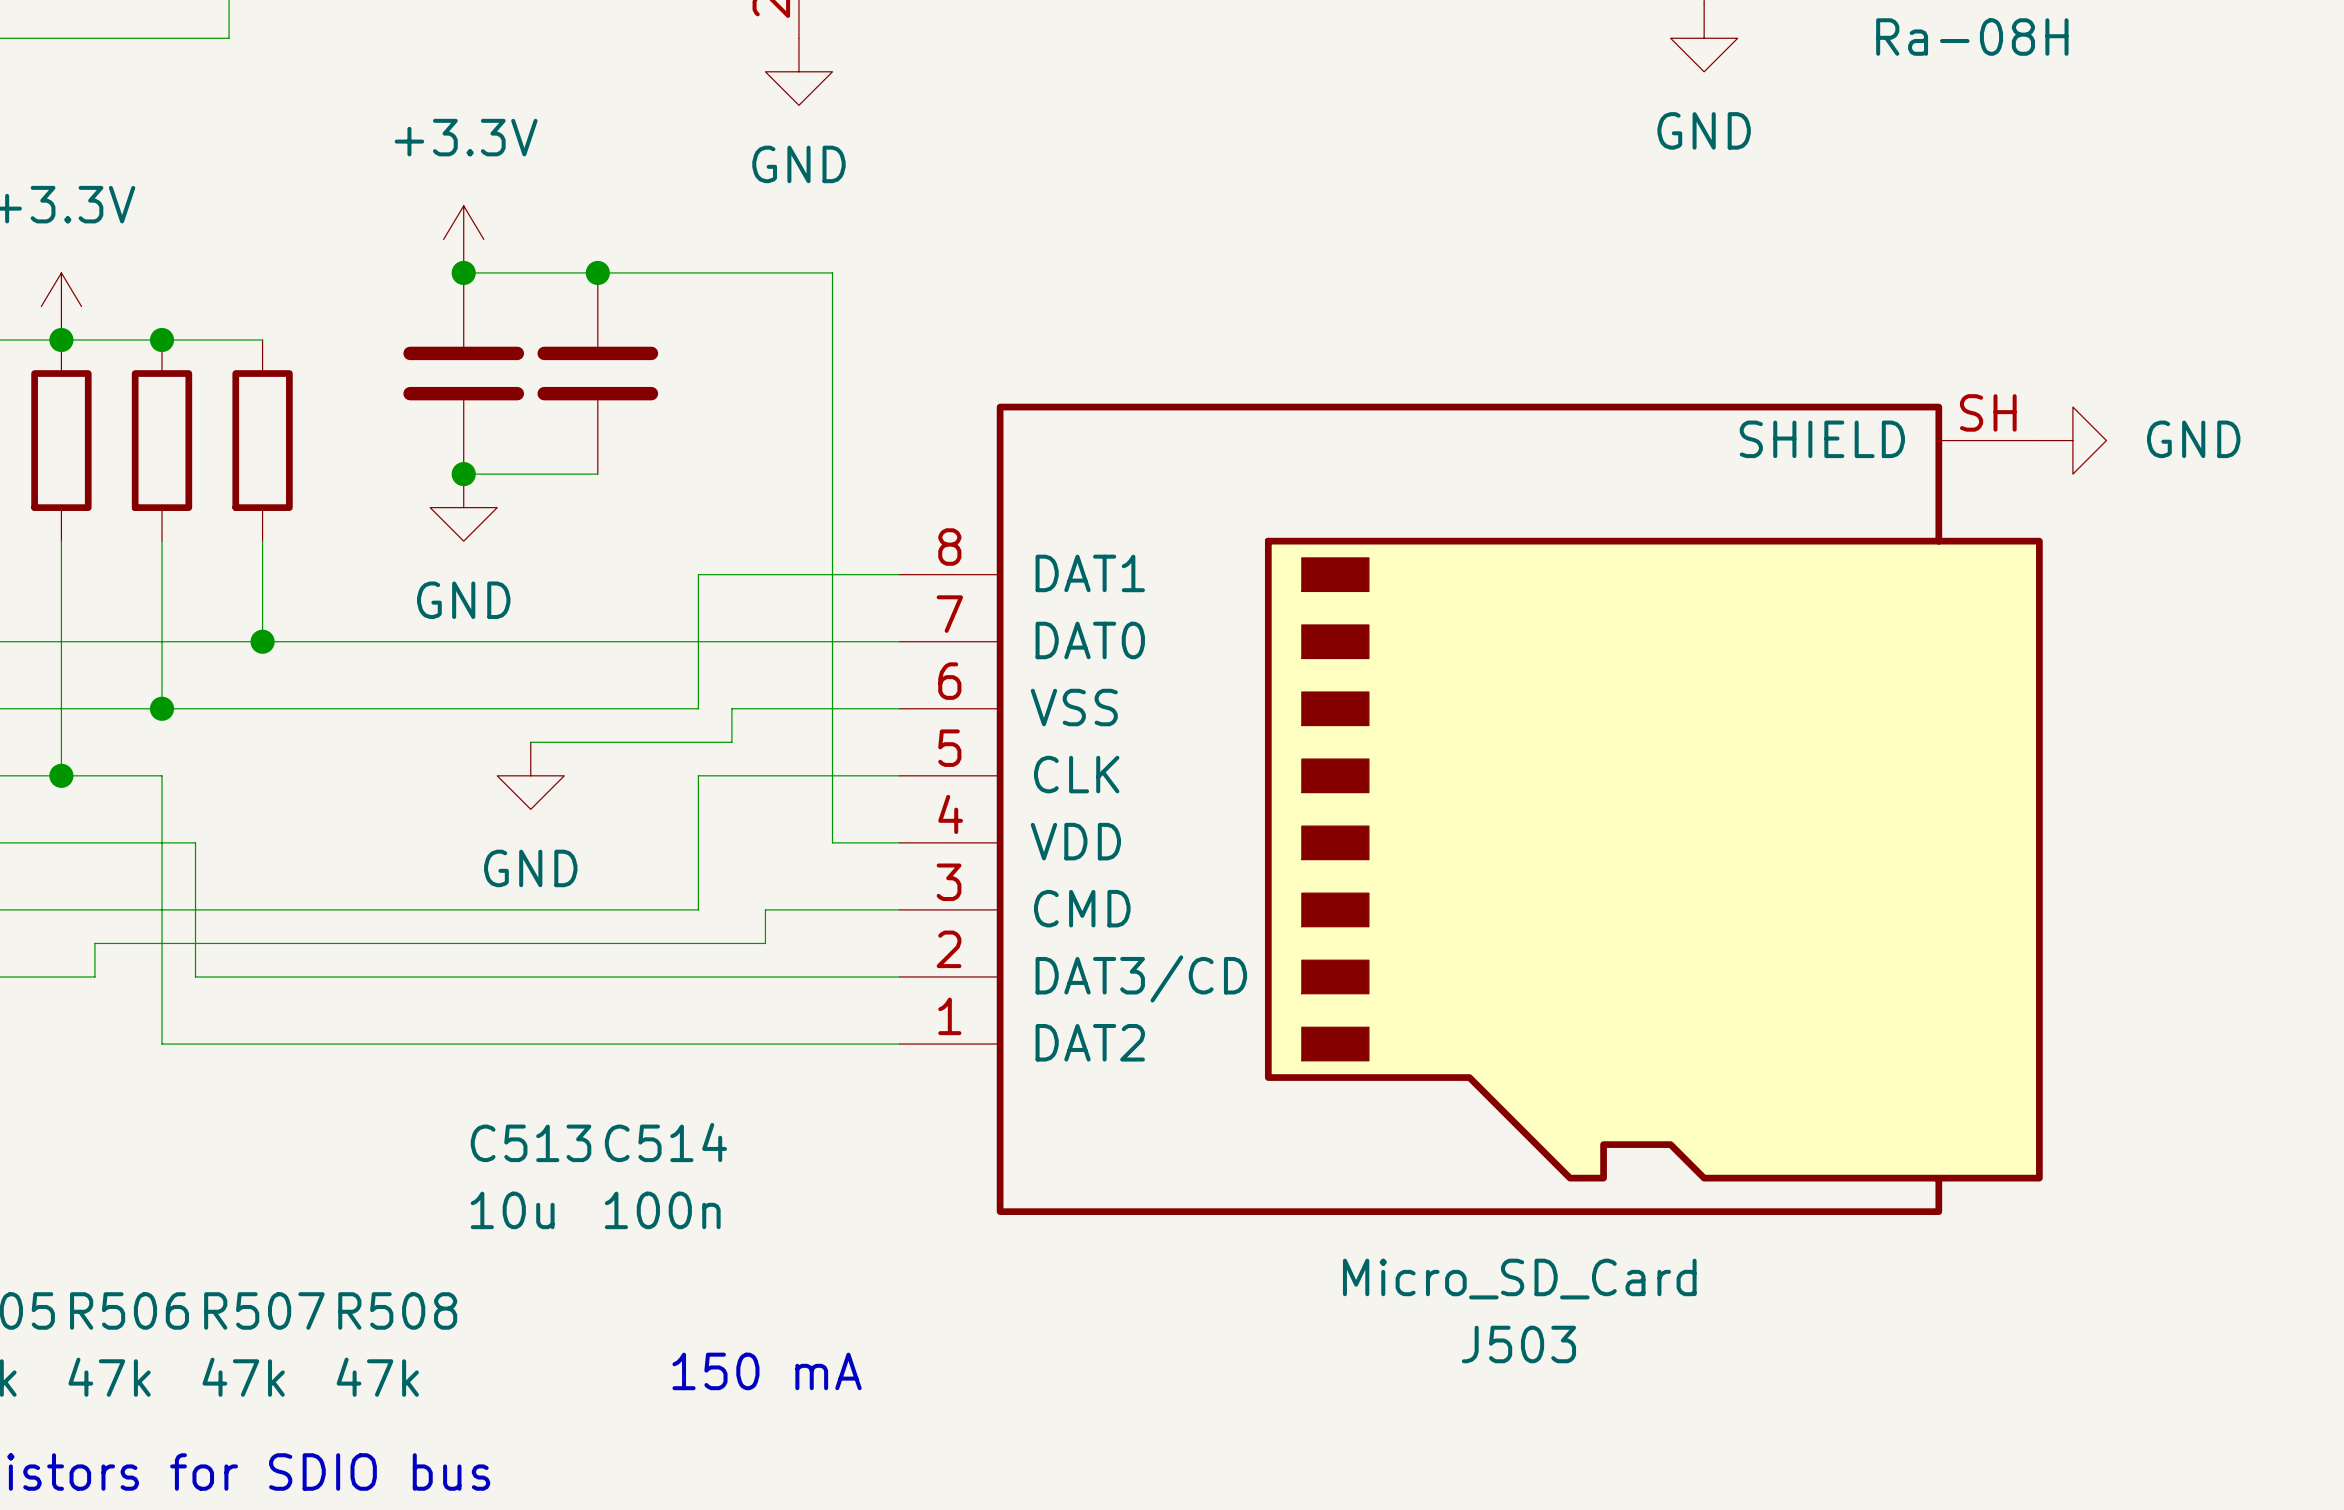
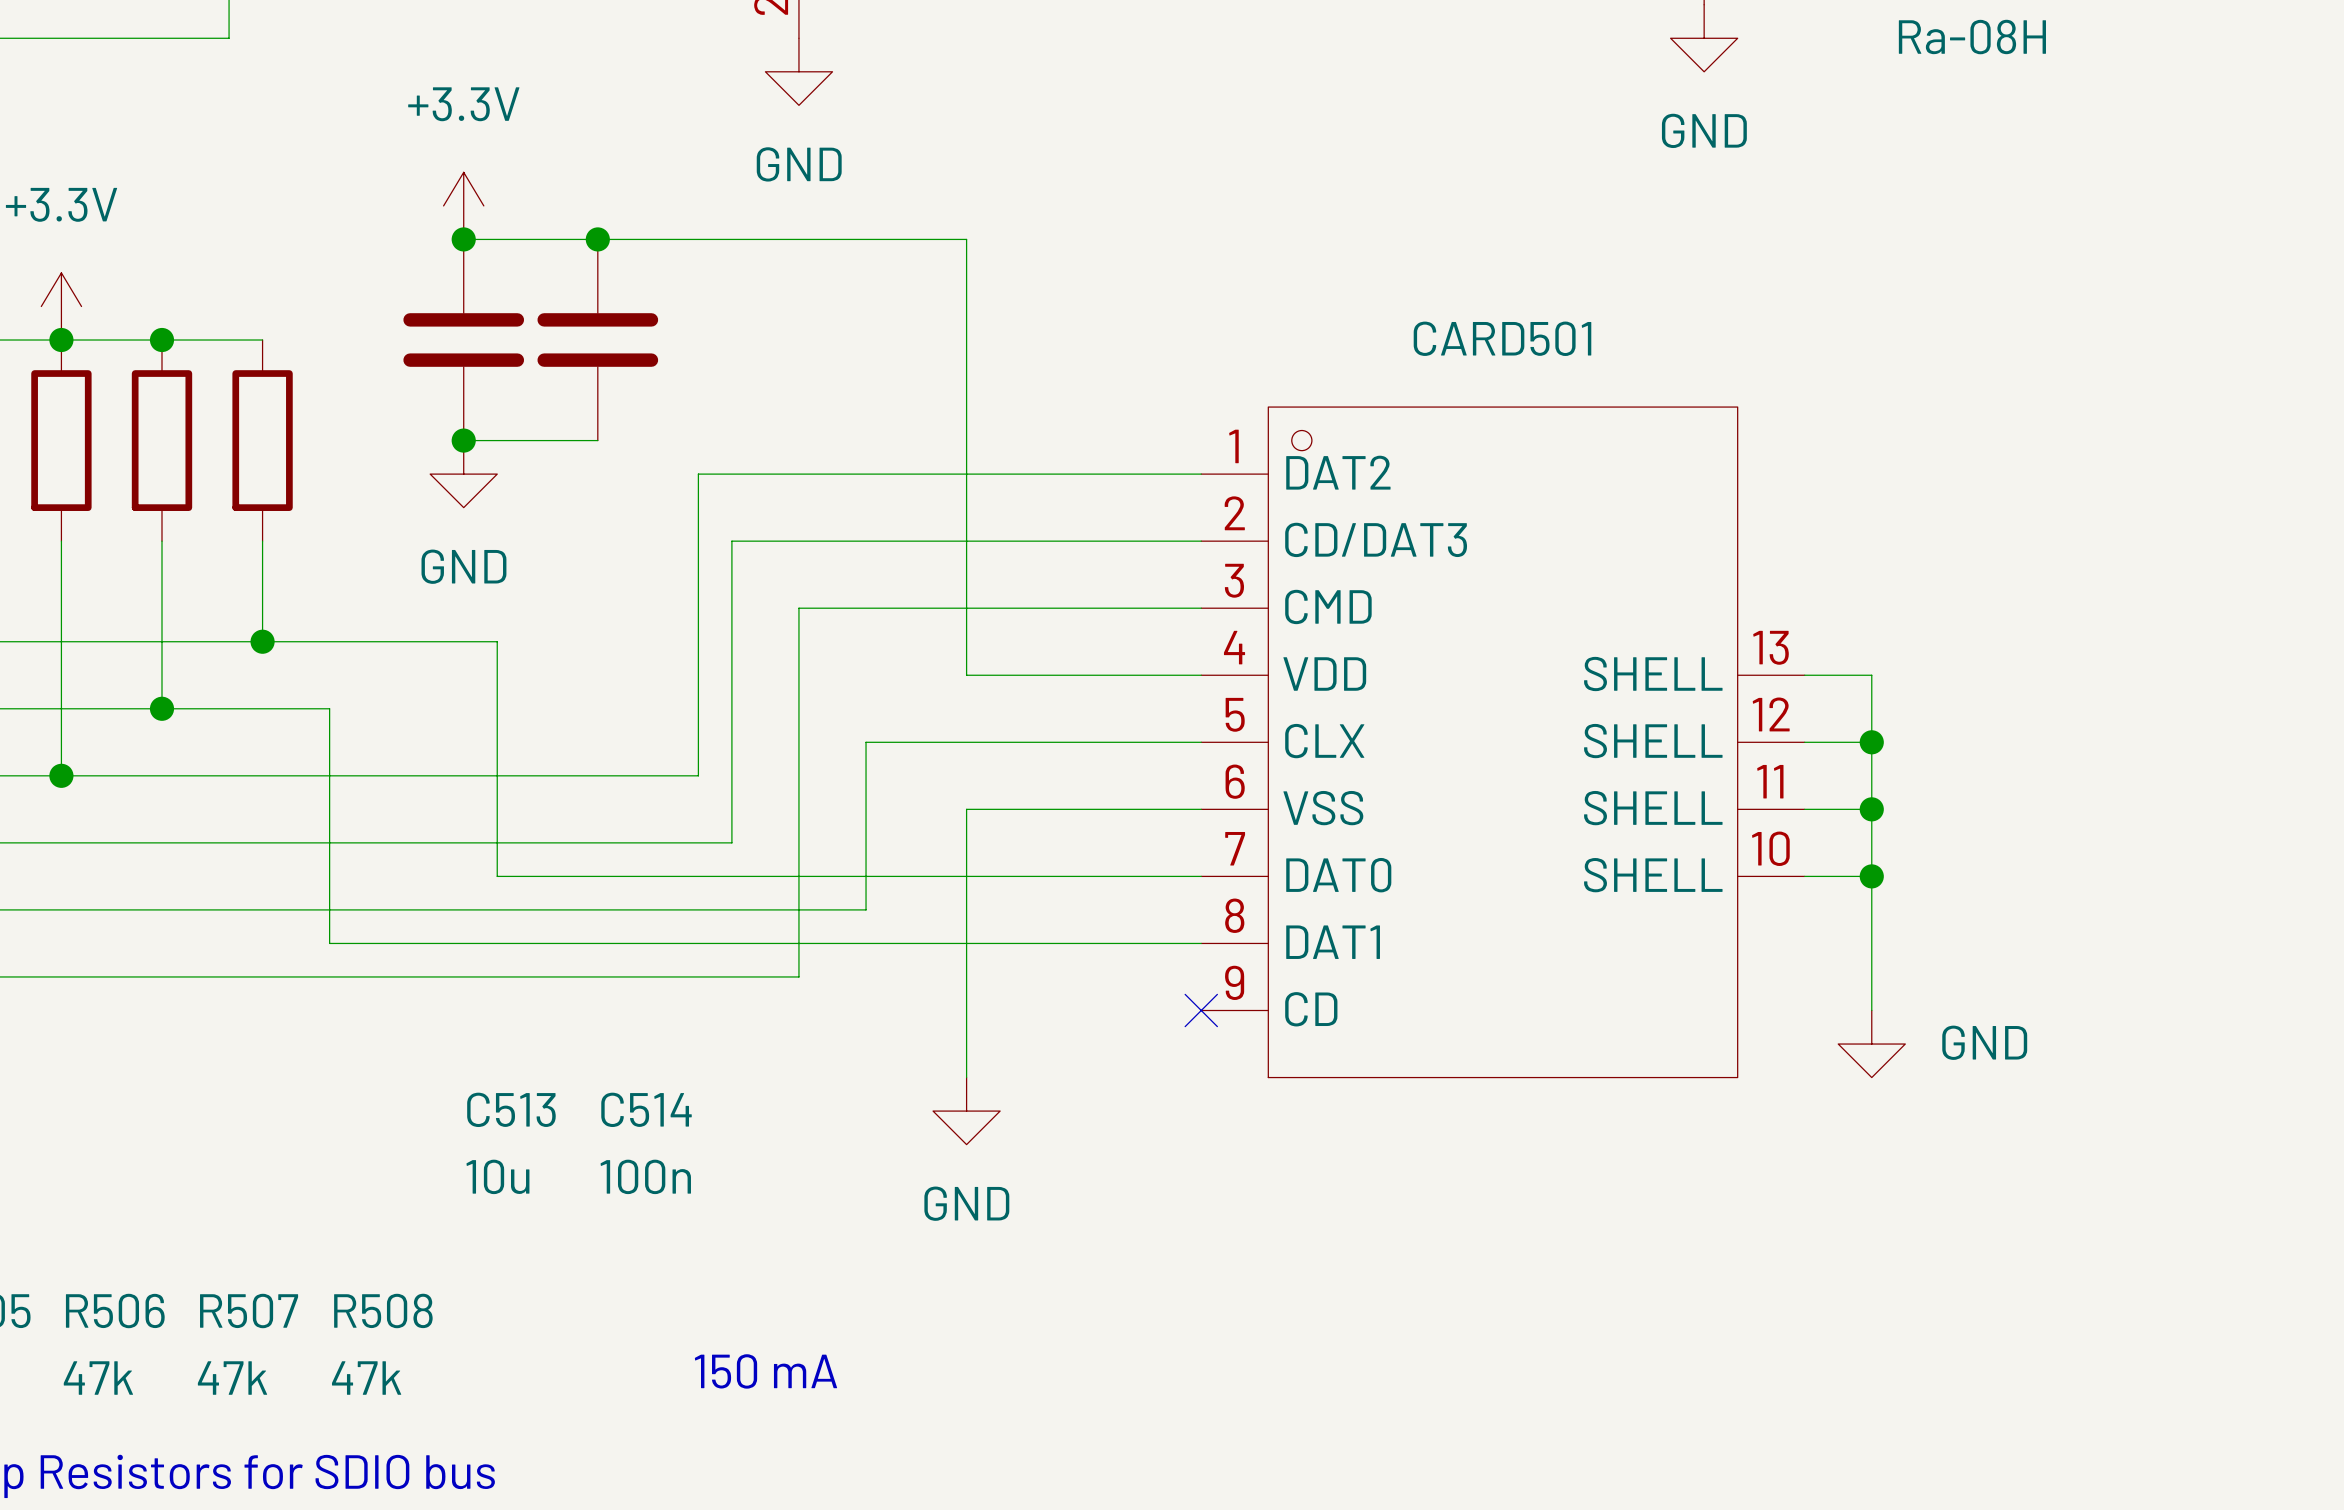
wire: none -> (463, 239) (966, 239) (966, 675) (1201, 675)
power symbol position: +3.3V (463, 239) -> +3.3V (463, 205)
wire: (463, 272) (832, 272) (832, 842) (899, 842) -> none
junction position: (463, 272) -> (463, 239)
junction position: (597, 272) -> (597, 239)
C513 position: (463, 373) -> (463, 340)
C514 position: (597, 373) -> (597, 340)
power symbol rotation: 0° (2072, 440) -> 90° clockwise (1871, 1044)
power symbol position: GND (2072, 440) -> GND (1871, 1044)
wire: (463, 474) (597, 474) -> (463, 440) (597, 440)
junction position: (463, 474) -> (463, 440)
power symbol position: GND (463, 507) -> GND (463, 474)
wire: (698, 574) (899, 574) -> (698, 574) (698, 474) (1201, 474)
wire: (497, 641) (899, 641) -> (497, 641) (497, 876) (1201, 876)
wire: (329, 708) (698, 708) -> (161, 775) (698, 775) (698, 708)
wire: none -> (329, 708) (329, 943)
wire: (731, 708) (899, 708) -> (731, 708) (731, 541) (1201, 541)
wire: (530, 742) (731, 742) -> (195, 842) (731, 842) (731, 742)
CARD501: none -> (1502, 742)
junction: none -> (1871, 742)
wire: (161, 775) (161, 1044) (899, 1044) -> none
power symbol: GND (530, 775) -> none
wire: (899, 775) (698, 775) (698, 909) -> none
wire: none -> (1201, 809) (966, 809) (966, 1077)
J503: Micro_SD_Card (1471, 809) -> none
junction: none -> (1871, 809)
wire: (195, 842) (195, 976) -> none
junction: none -> (1871, 876)
wire: (765, 909) (765, 943) -> (765, 909) (698, 909)
wire: (866, 909) (899, 909) -> (866, 909) (866, 742) (1201, 742)
wire: (329, 943) (94, 943) (94, 976) -> (195, 976) (94, 976)
wire: none -> (765, 943) (1201, 943)
wire: (798, 976) (899, 976) -> (798, 976) (798, 608) (1201, 608)
no-connect mark: none -> (1201, 1010)
power symbol: none -> GND (966, 1111)

